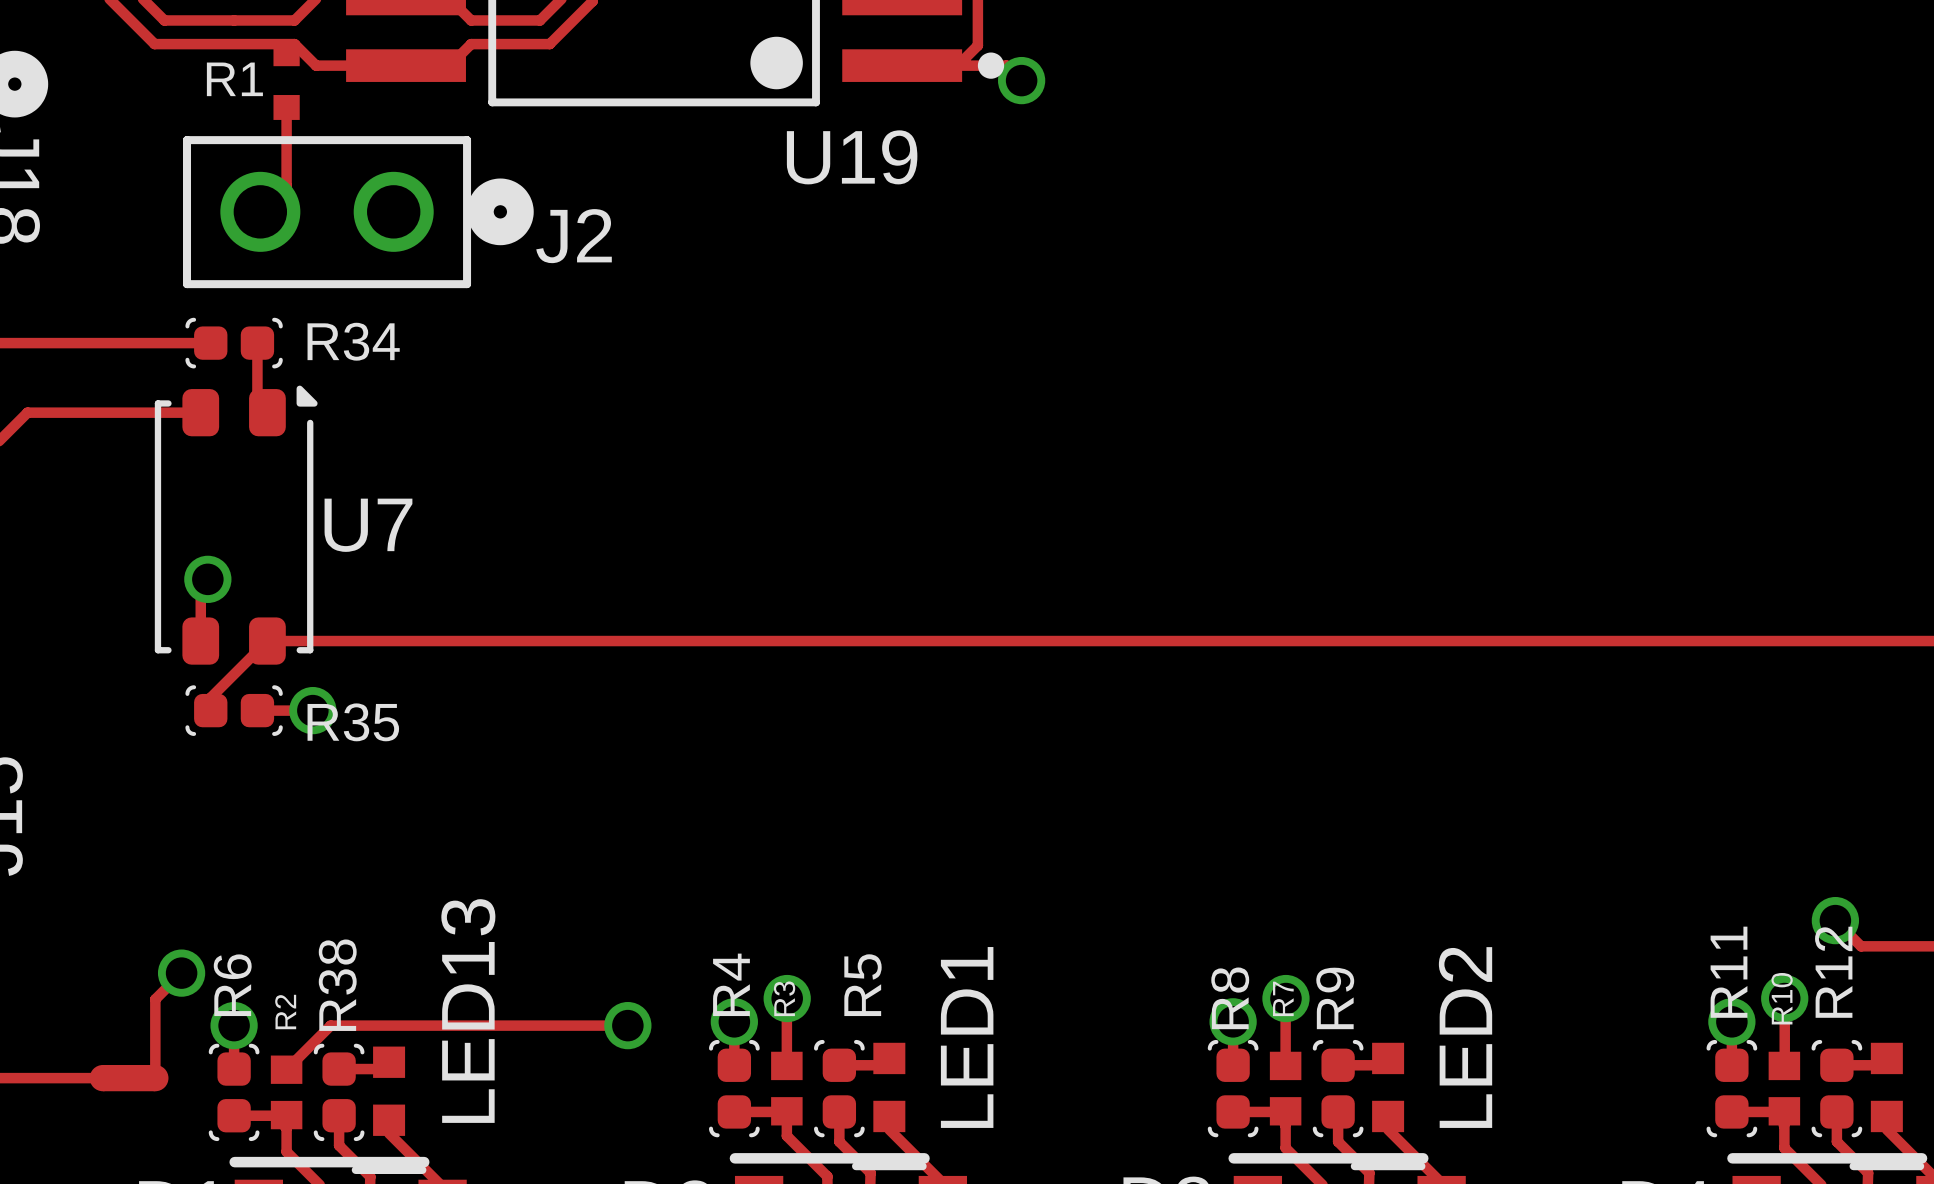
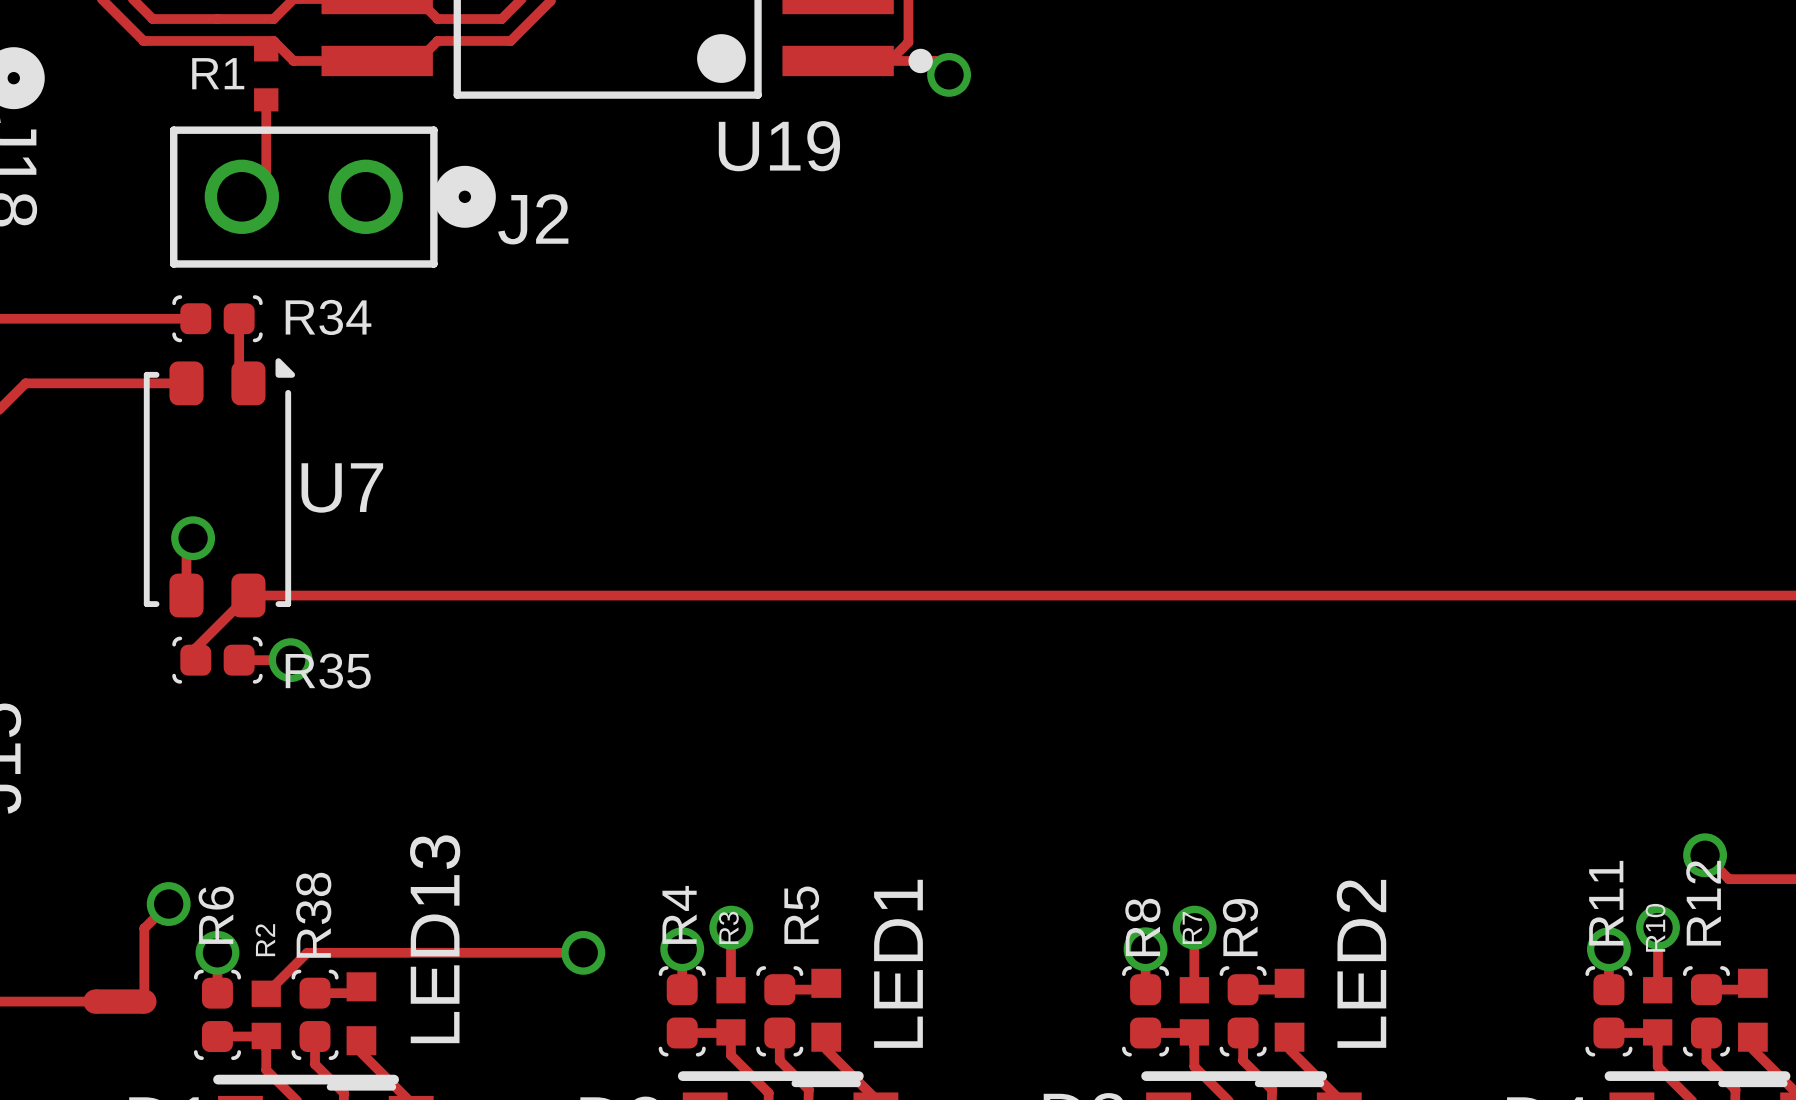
U19 name position: U19 (852, 157) -> U19 (779, 146)

